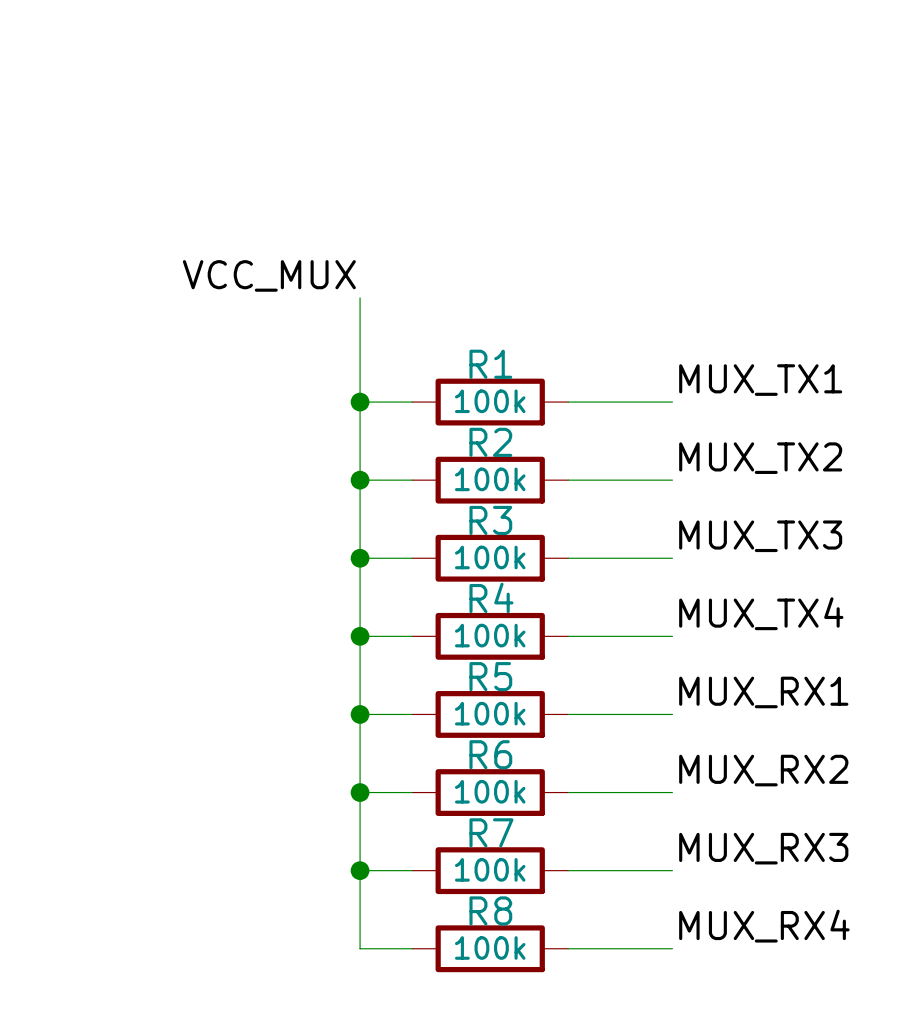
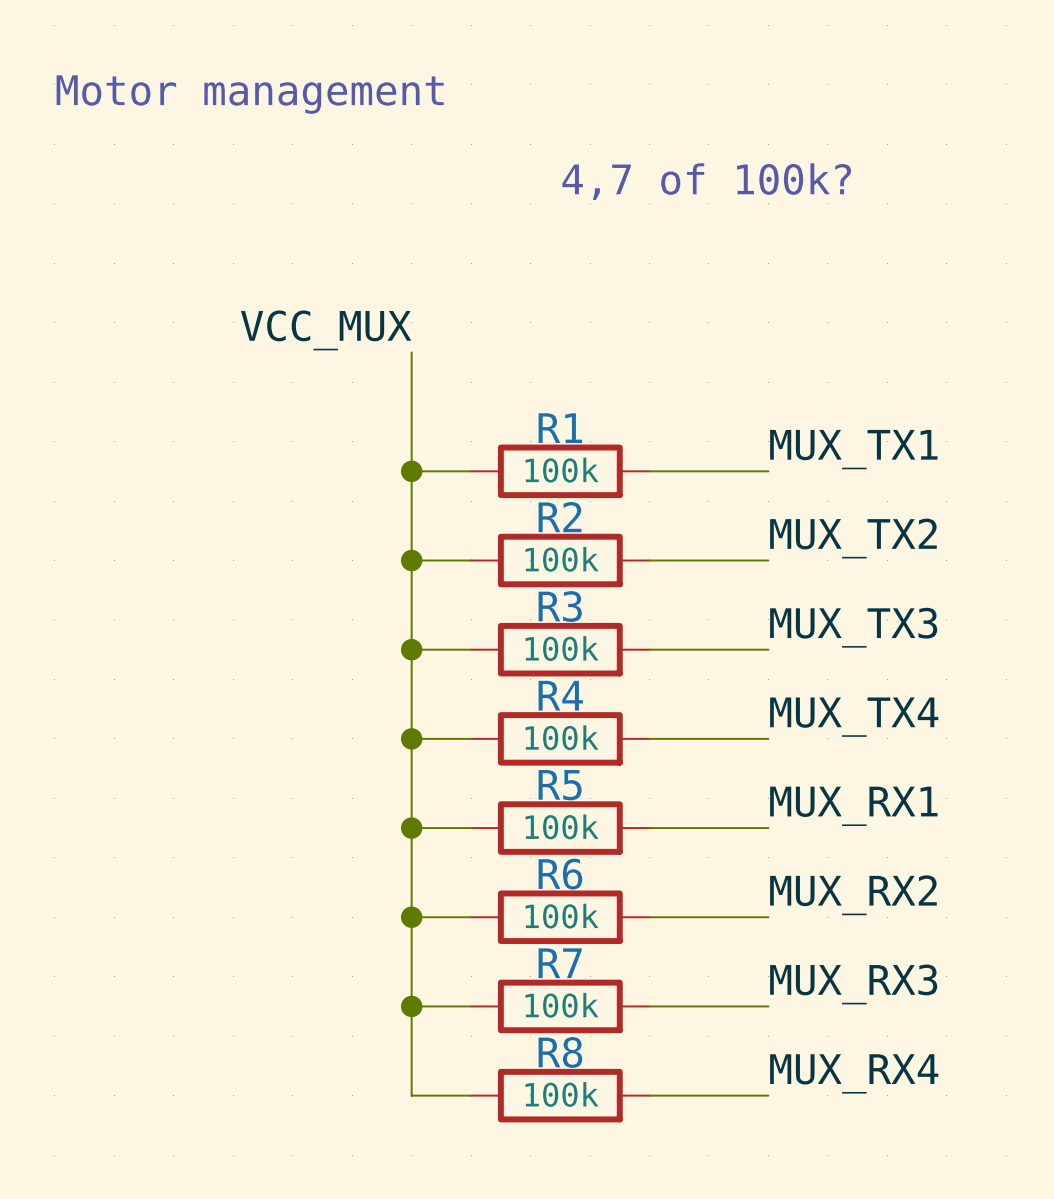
text: none -> Motor management (250, 94)
text: none -> 4,7 of 100k? (706, 181)

